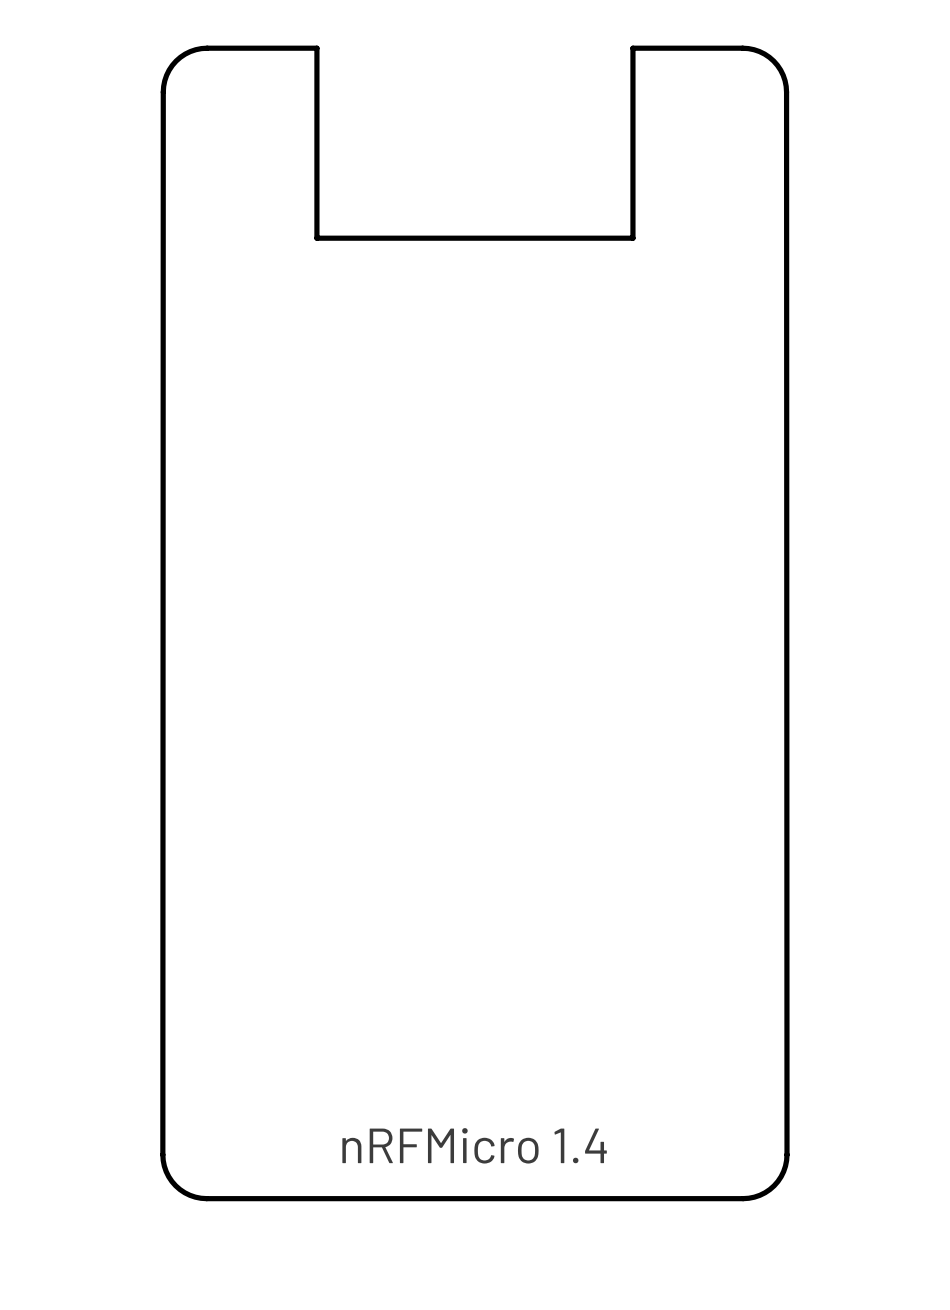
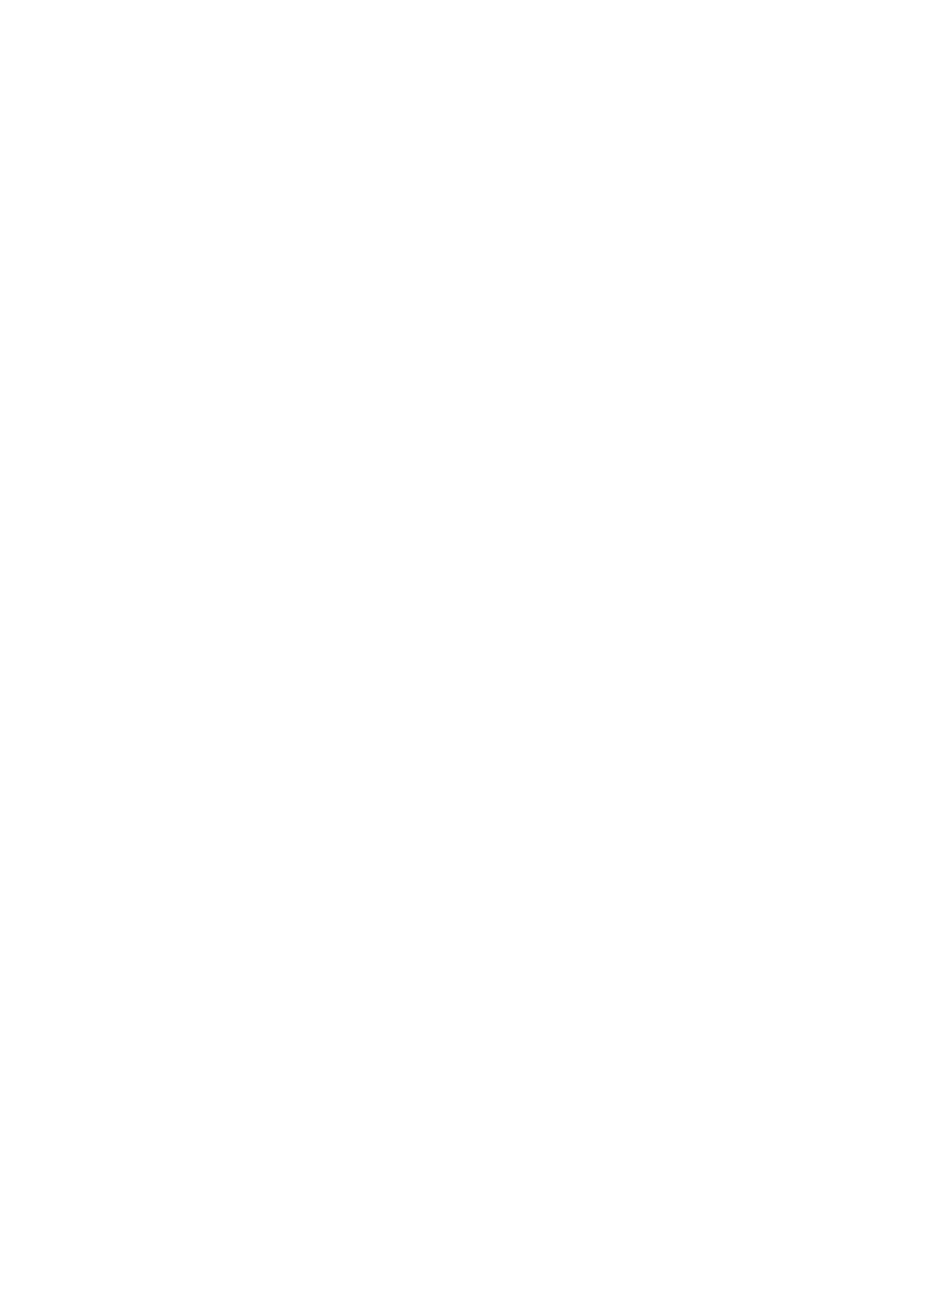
board edge: (742, 48) (632, 48) (632, 238) (316, 238) (316, 48) (201, 48) (180, 57) (166, 75) (163, 92) (162, 1154) (166, 1171) (171, 1181) (189, 1195) (206, 1198) (743, 1198) (759, 1195) (769, 1189) (783, 1171) (787, 1154) (786, 92) (783, 75) (773, 61) (759, 51) (742, 48) -> none
text: nRFMicro 1.4 (474, 1145) -> none

